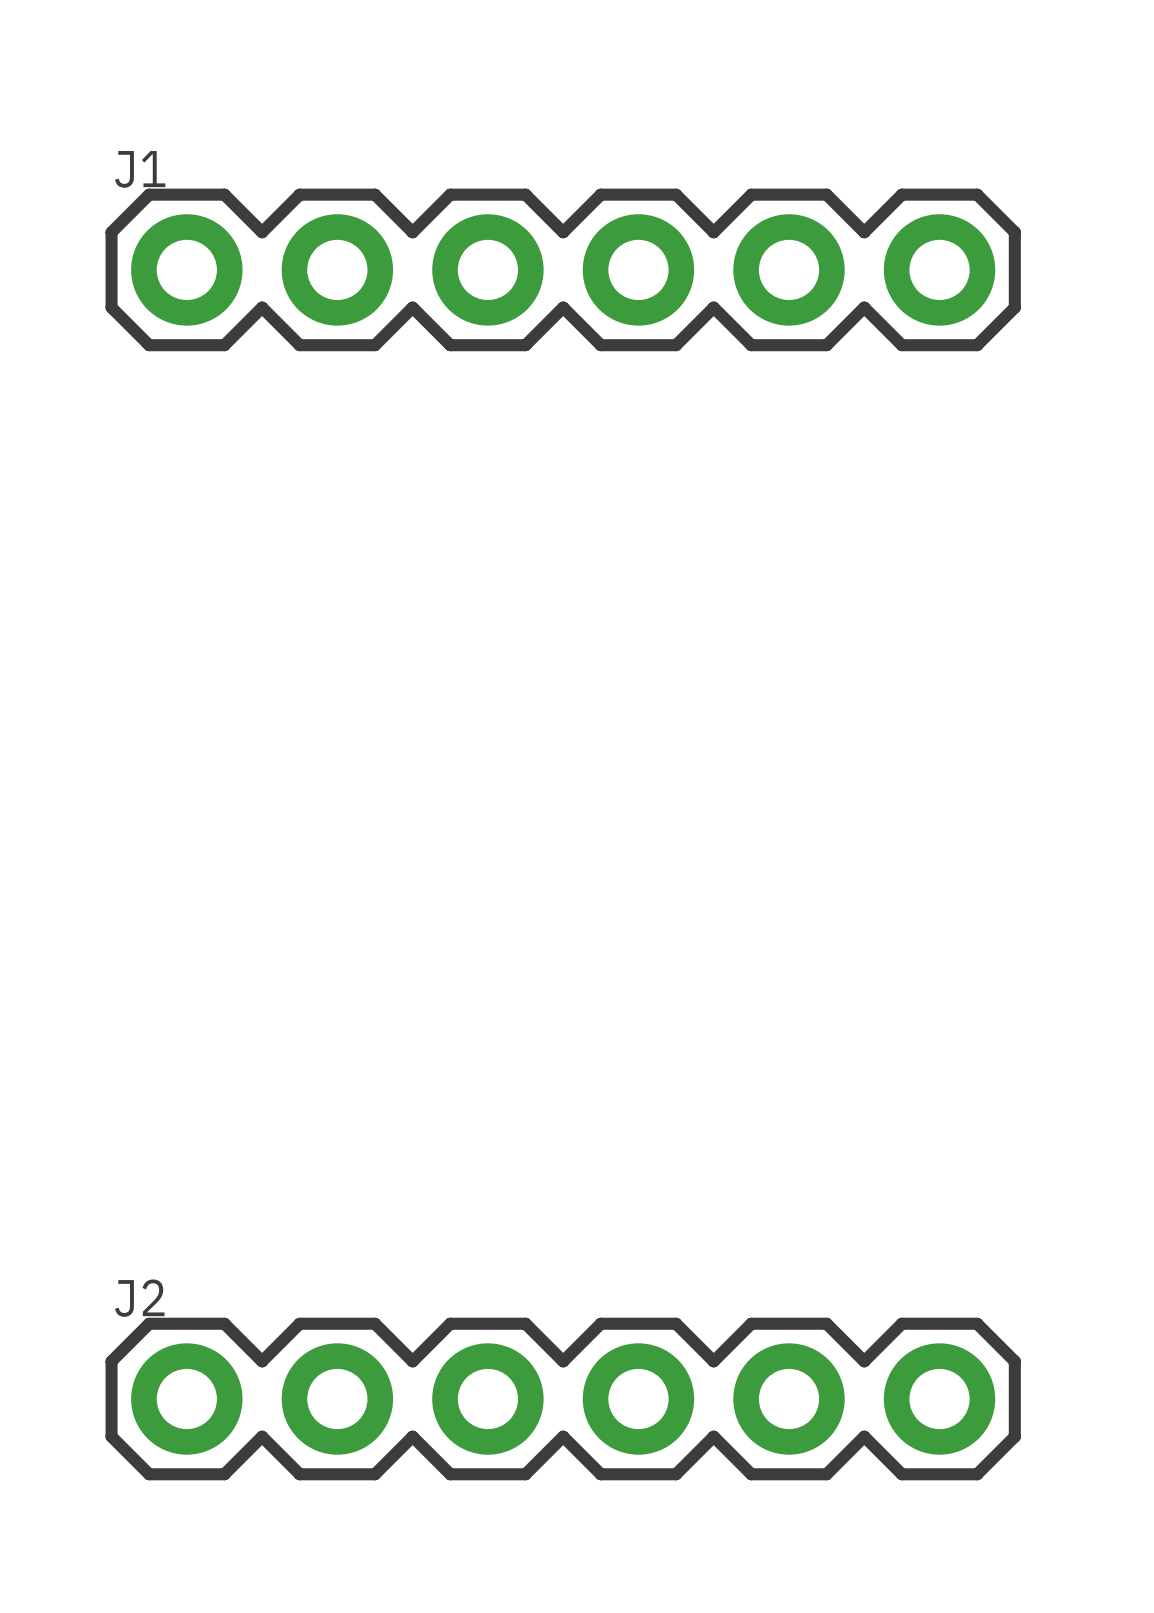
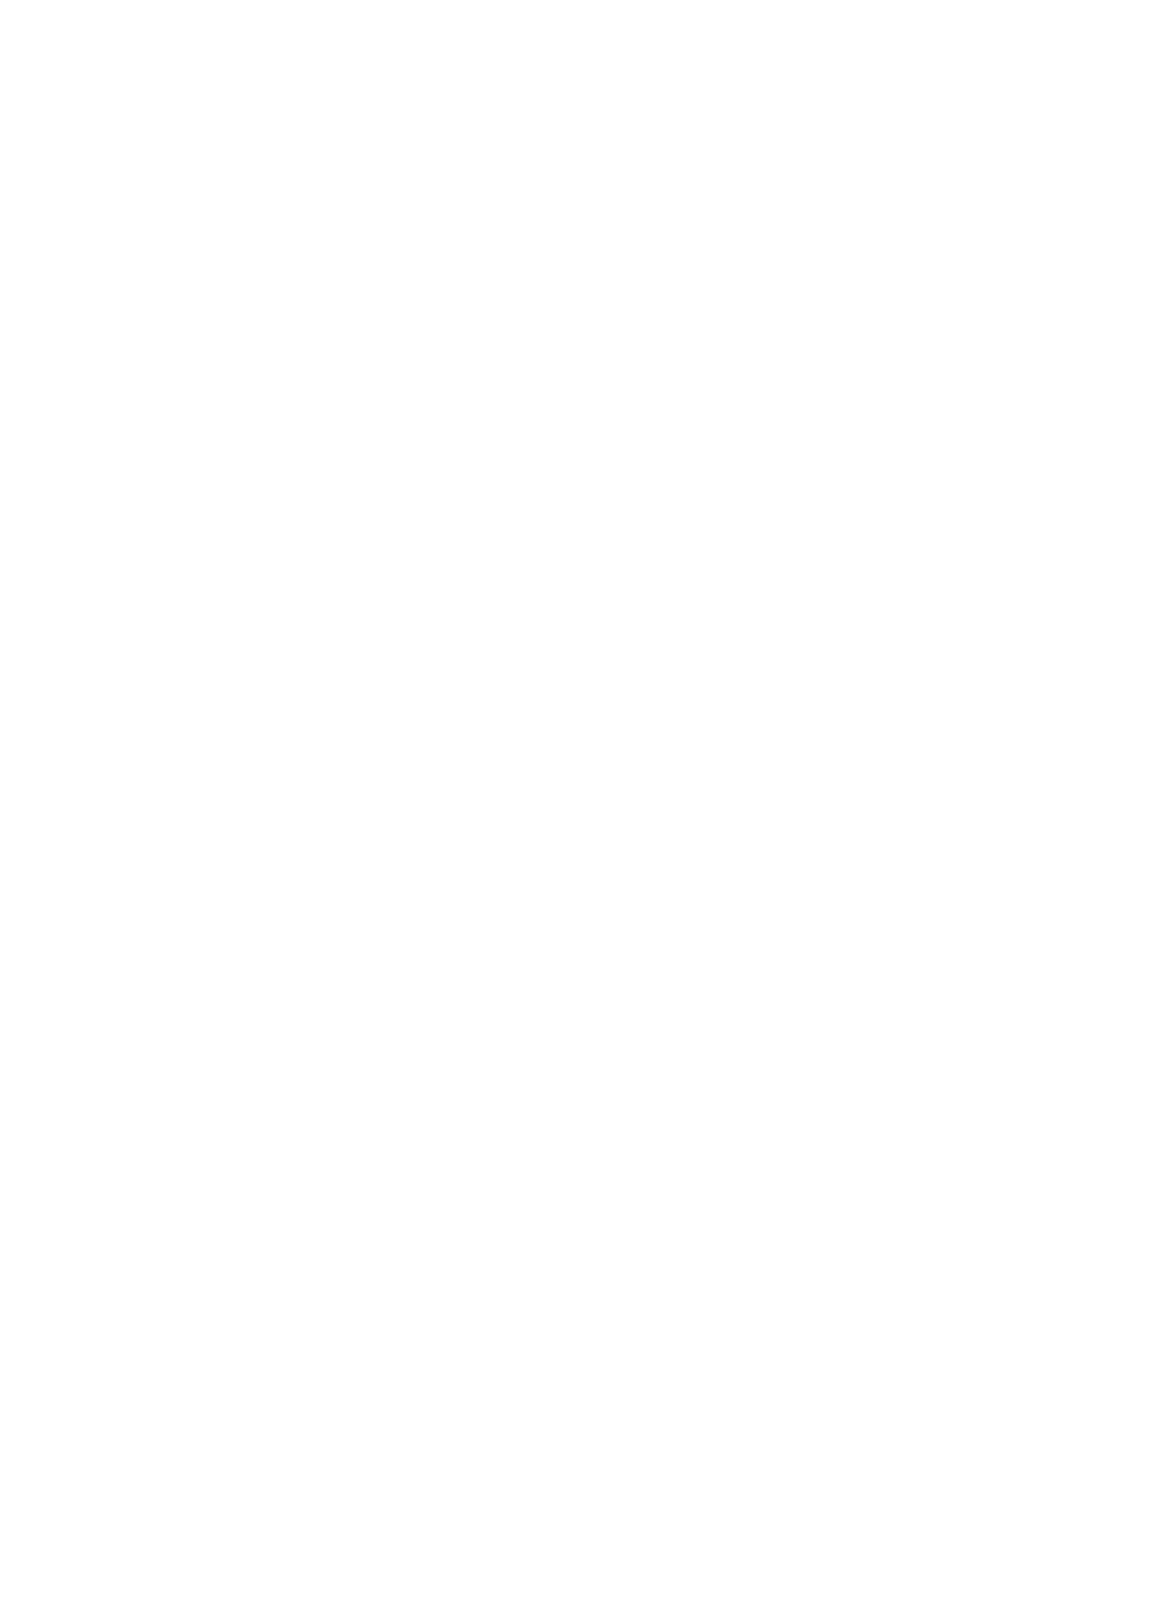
J1: (563, 269) -> none
J2: (563, 1399) -> none

